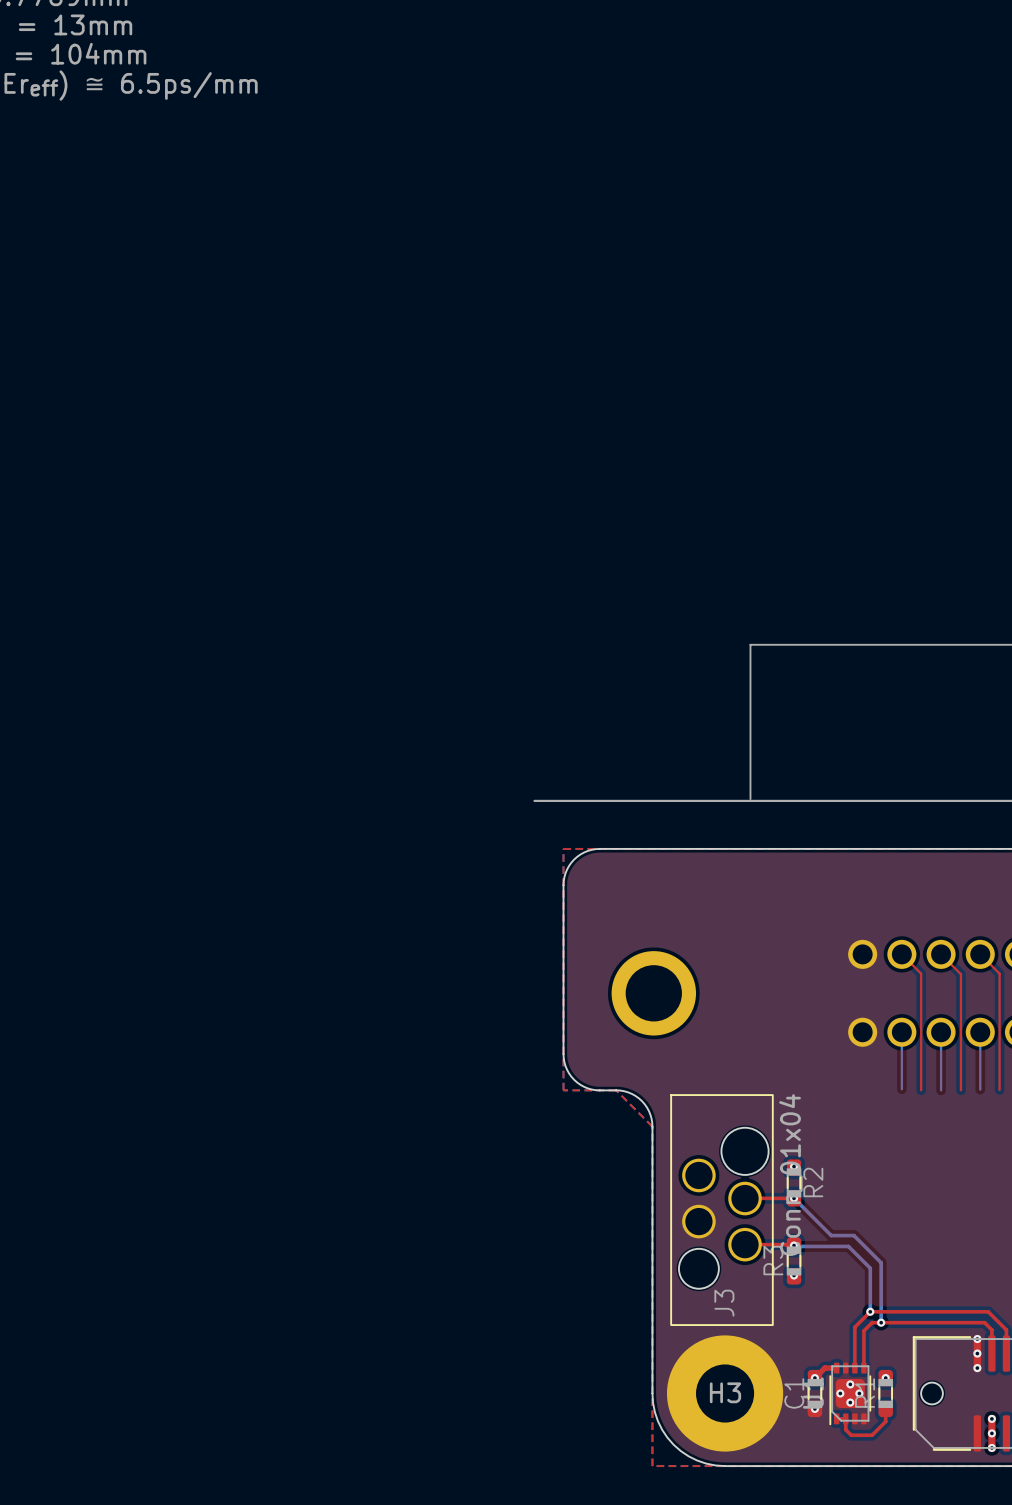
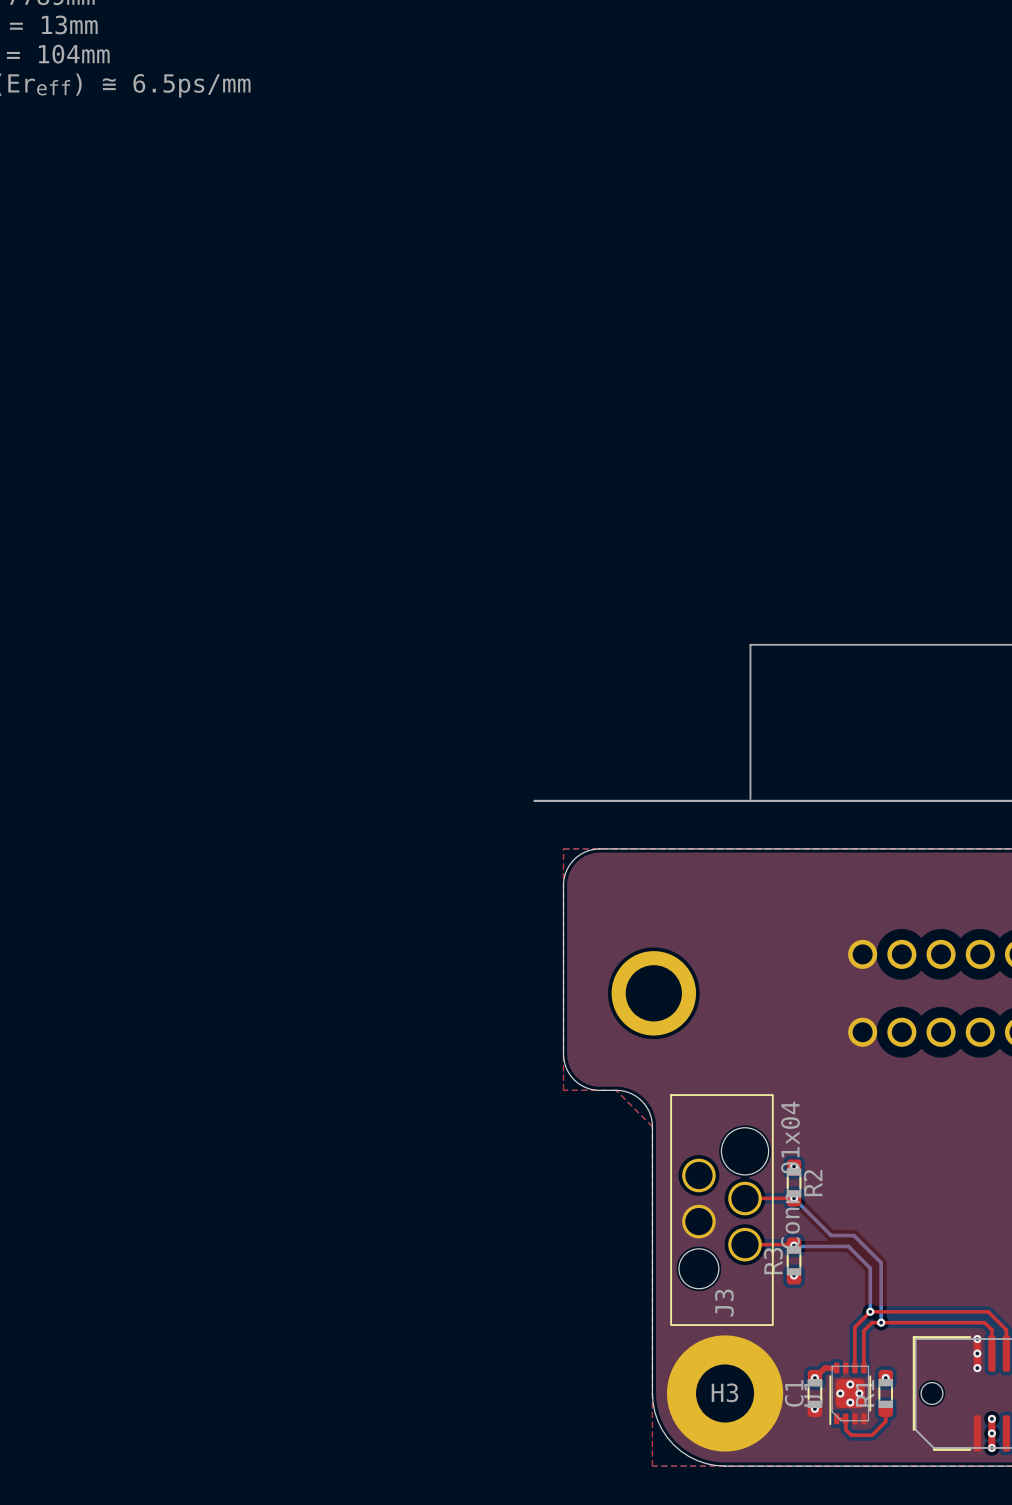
top track: (901, 954) (921, 973) (921, 1090) -> none
top track: (941, 954) (960, 974) (960, 1090) -> none
top track: (980, 954) (999, 973) (999, 1089) -> none
bottom track: (901, 1032) (901, 1089) -> none
bottom track: (941, 1032) (941, 1090) -> none
bottom track: (980, 1032) (980, 1089) -> none

